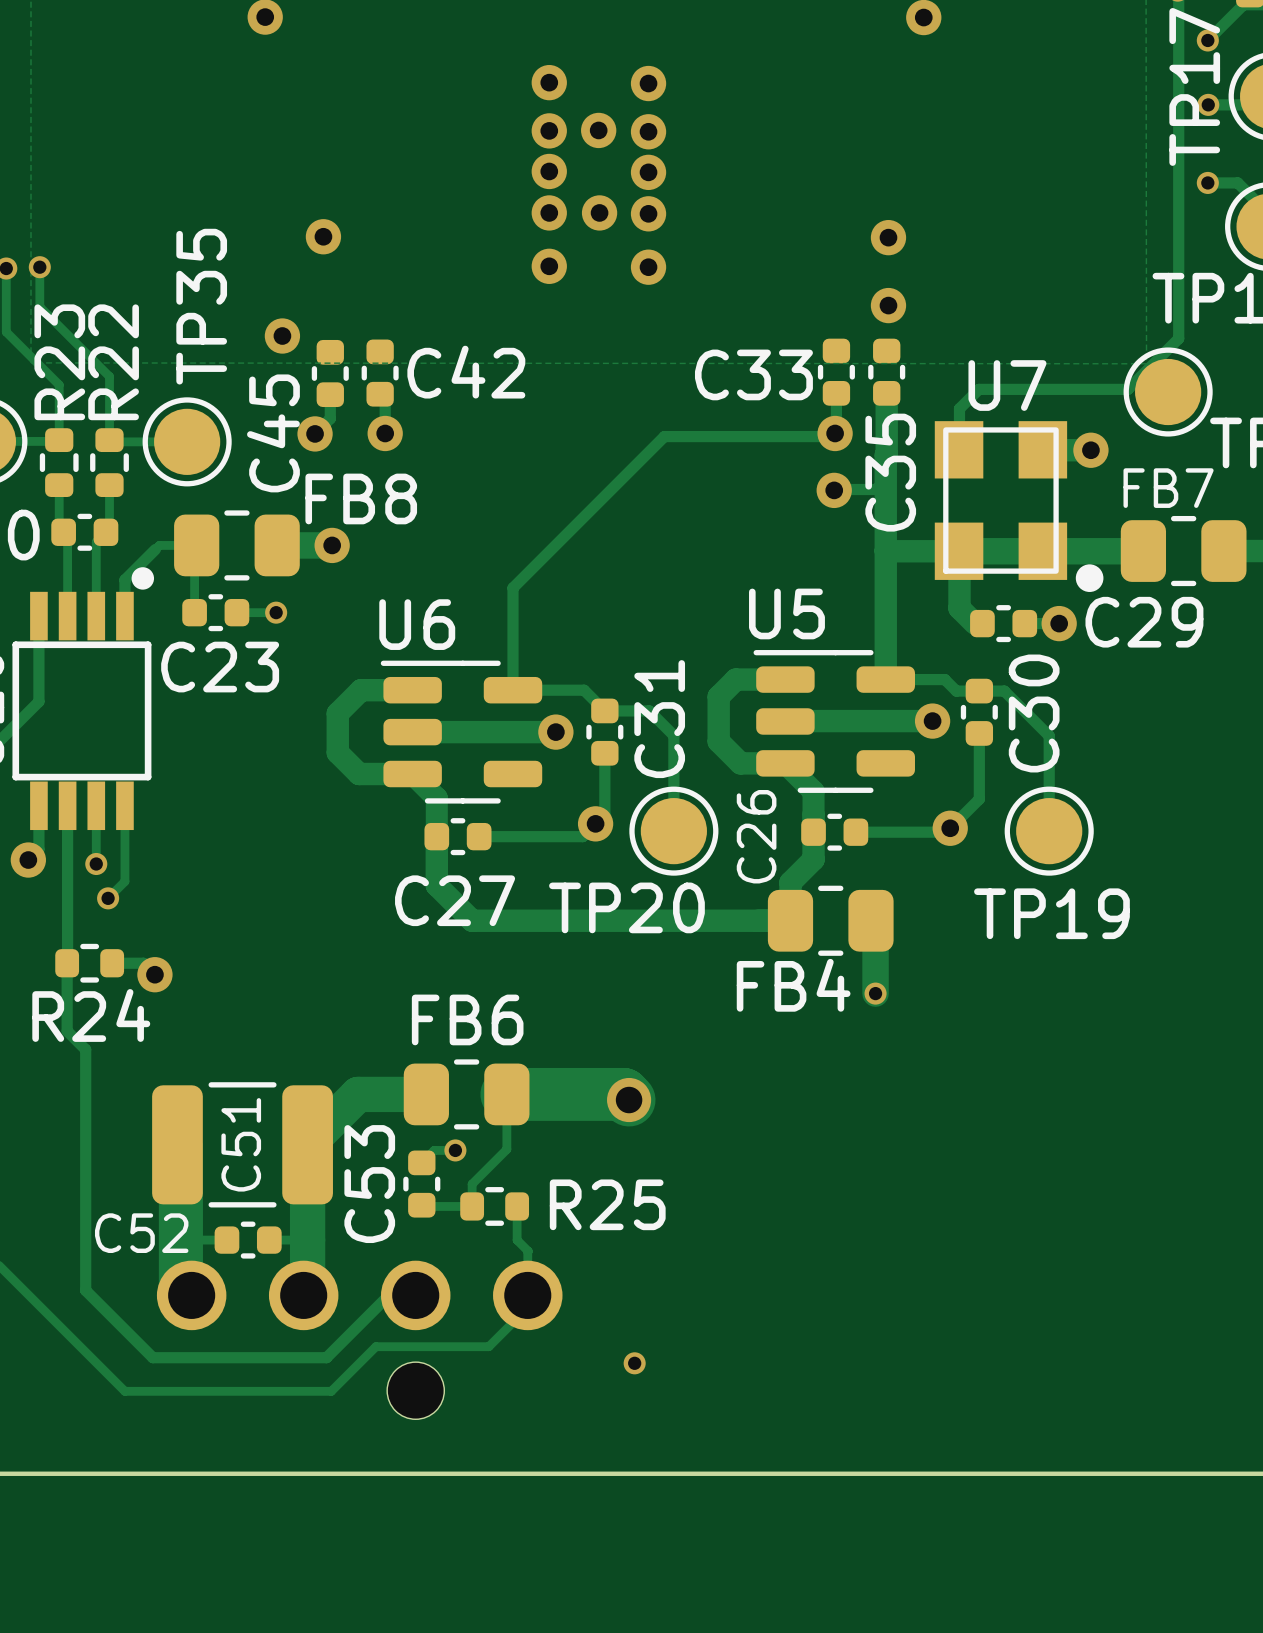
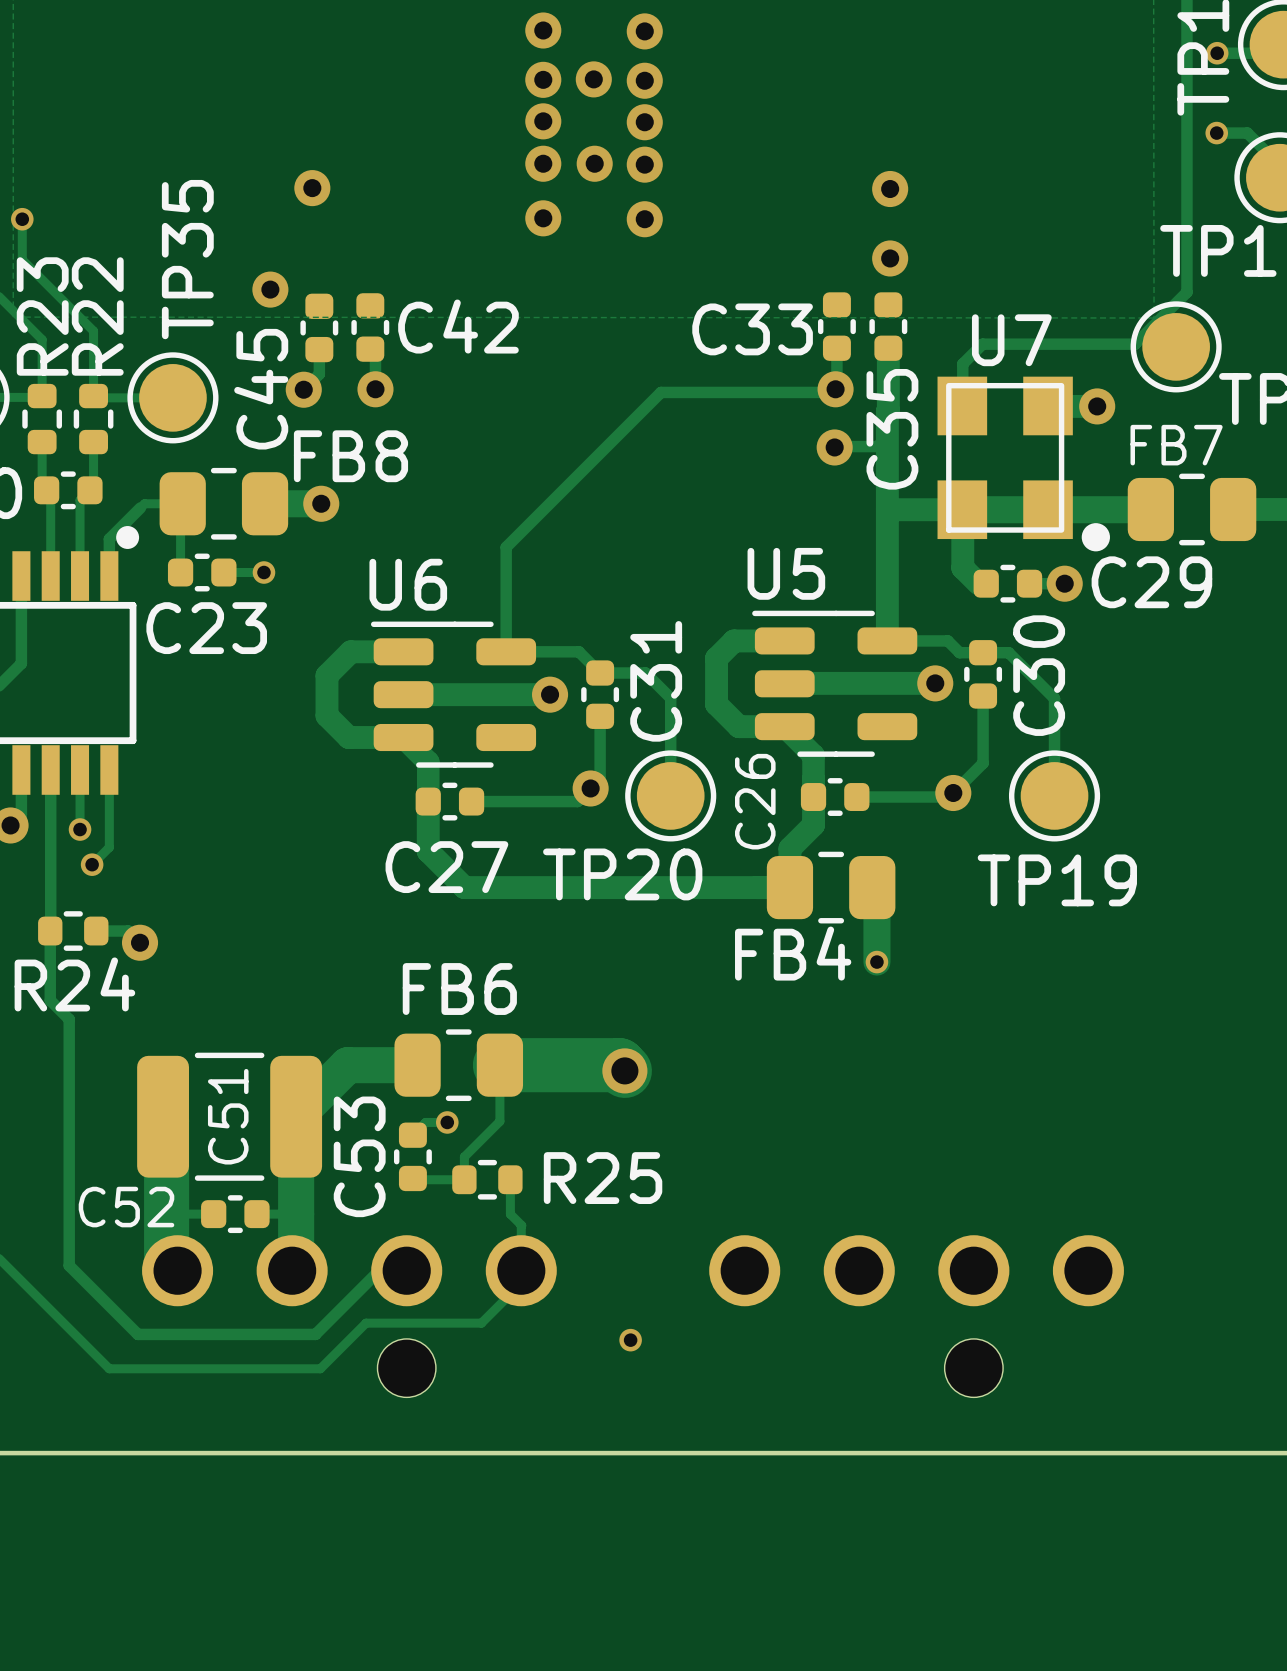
part: none -> (916, 1316)

